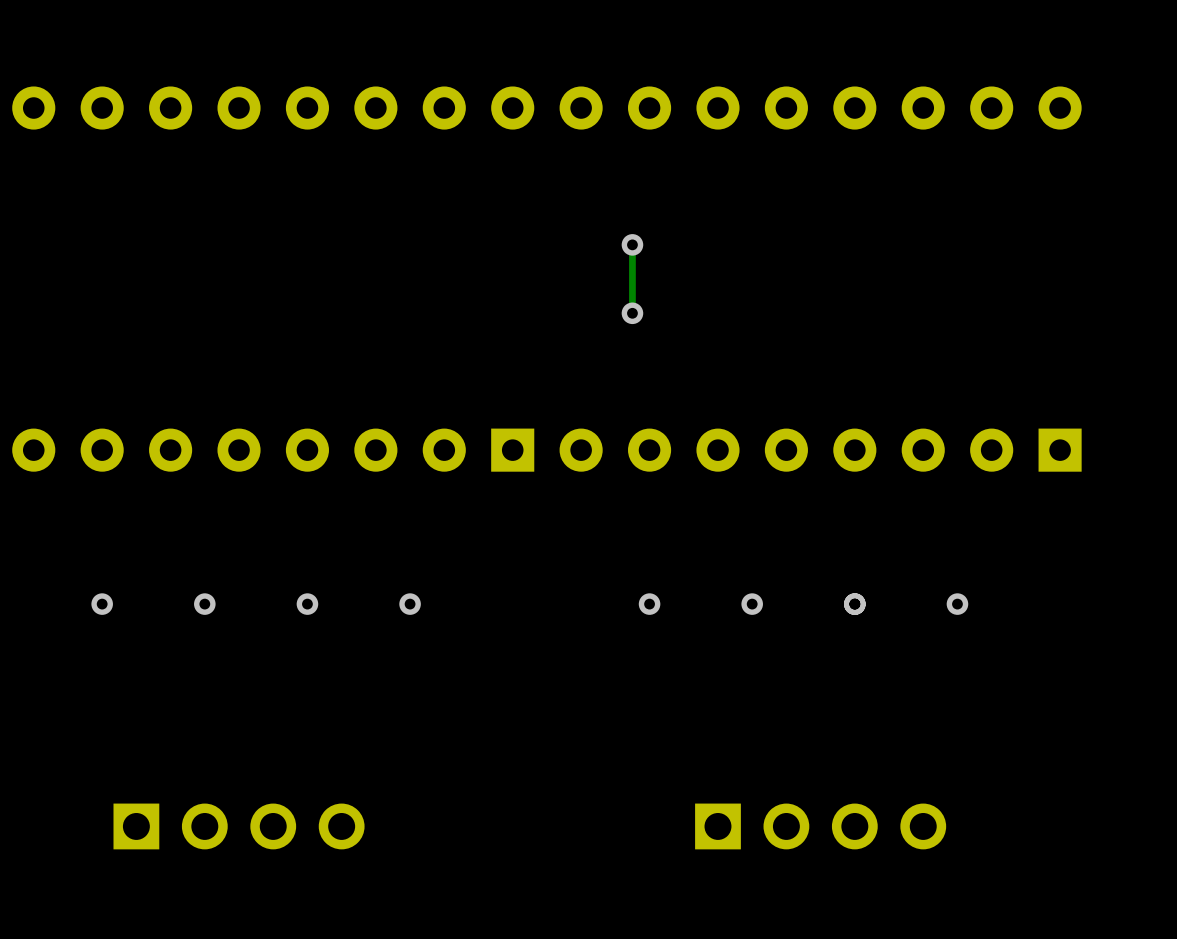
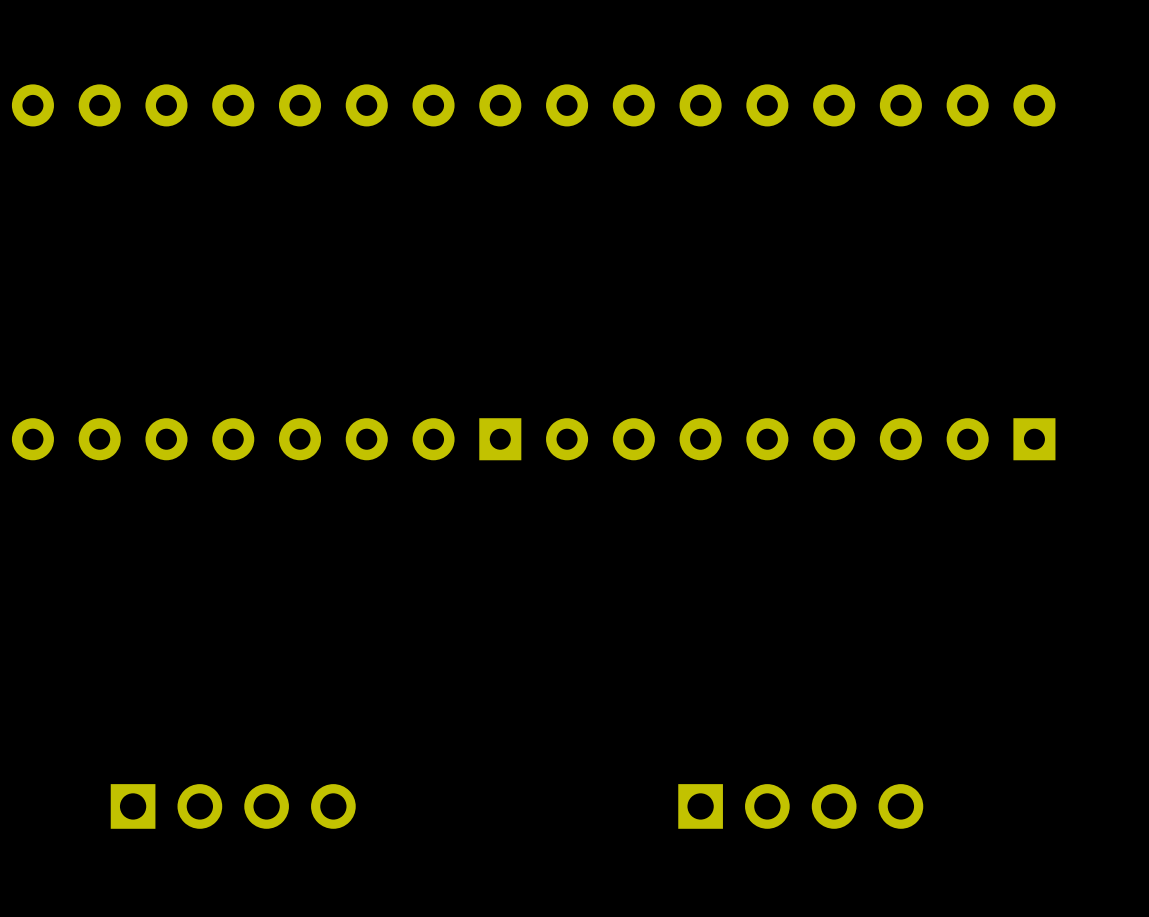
track: (632, 244) (632, 313) -> none
via: (632, 244) -> none
via: (632, 313) -> none
via: (102, 604) -> none
via: (204, 604) -> none
via: (307, 604) -> none
via: (410, 604) -> none
via: (649, 604) -> none
via: (752, 604) -> none
via: (854, 604) -> none
via: (957, 604) -> none

